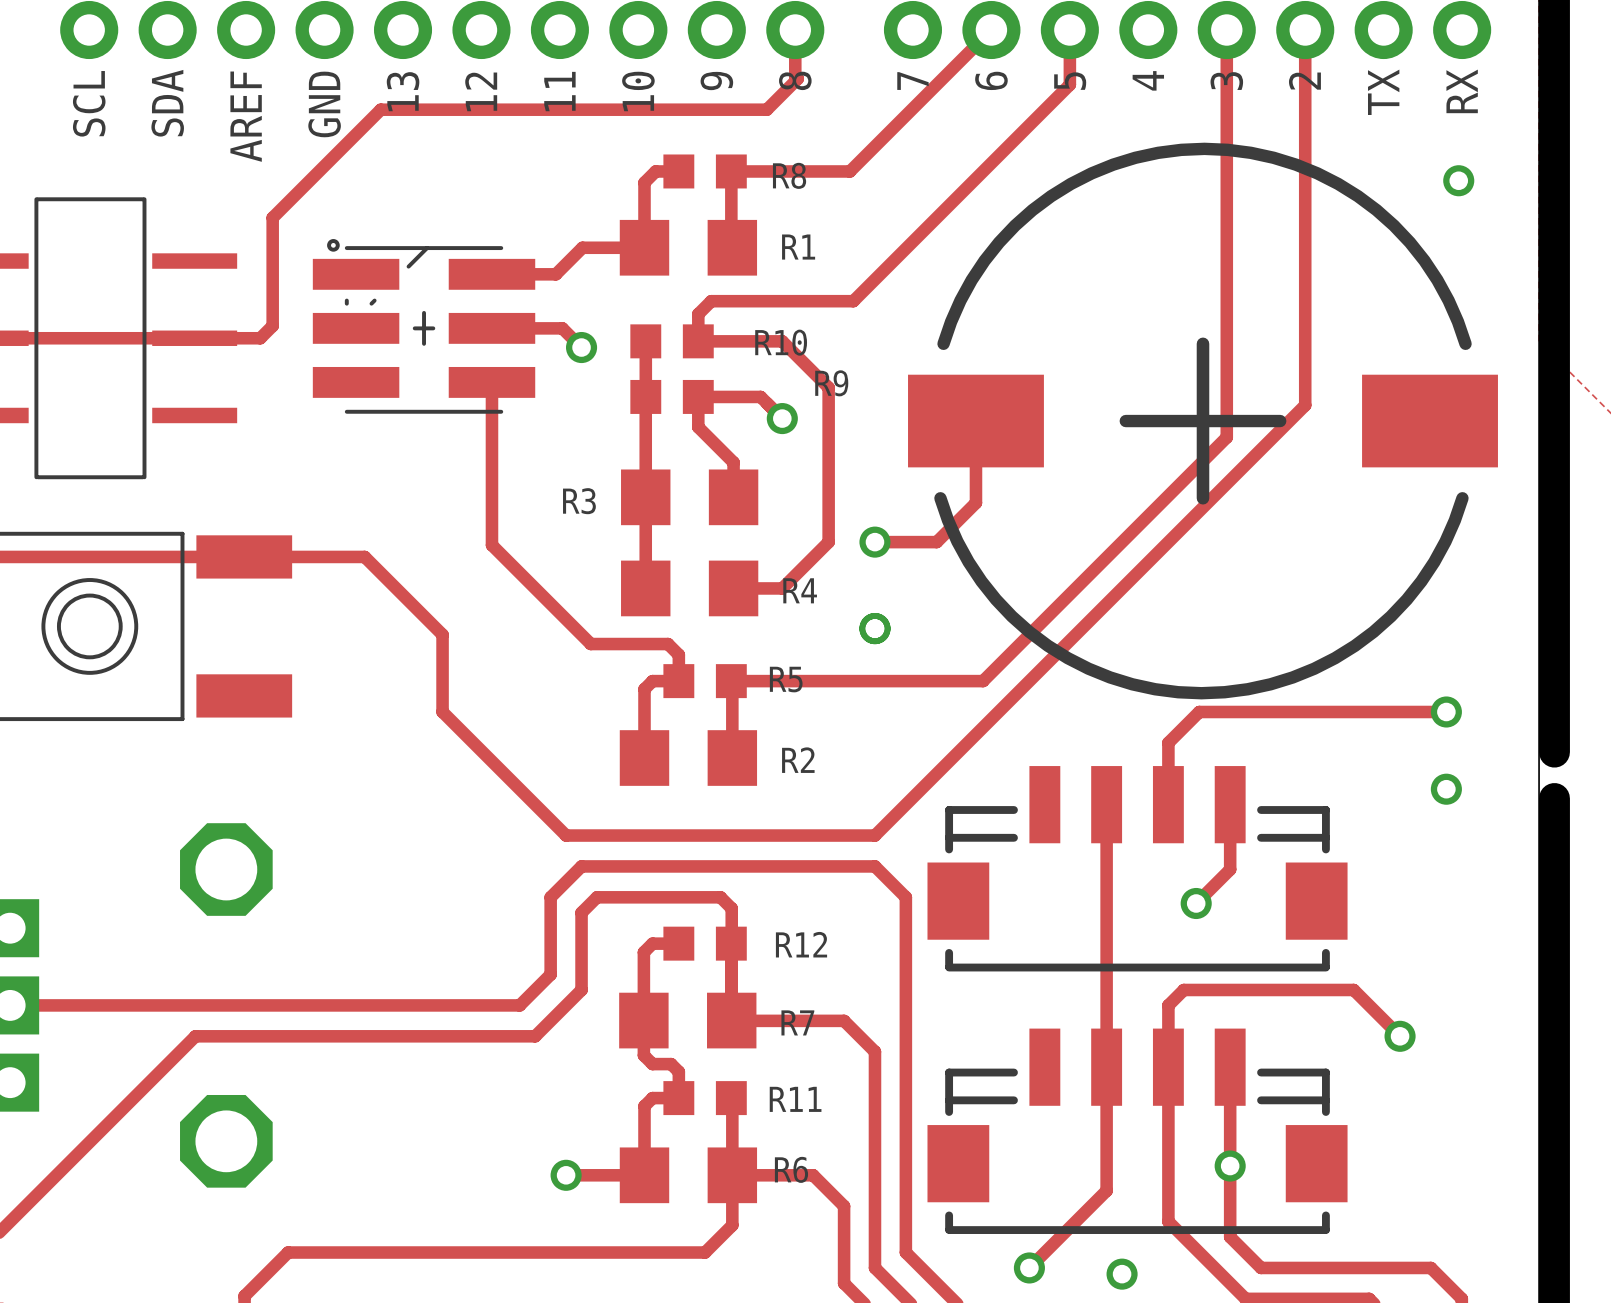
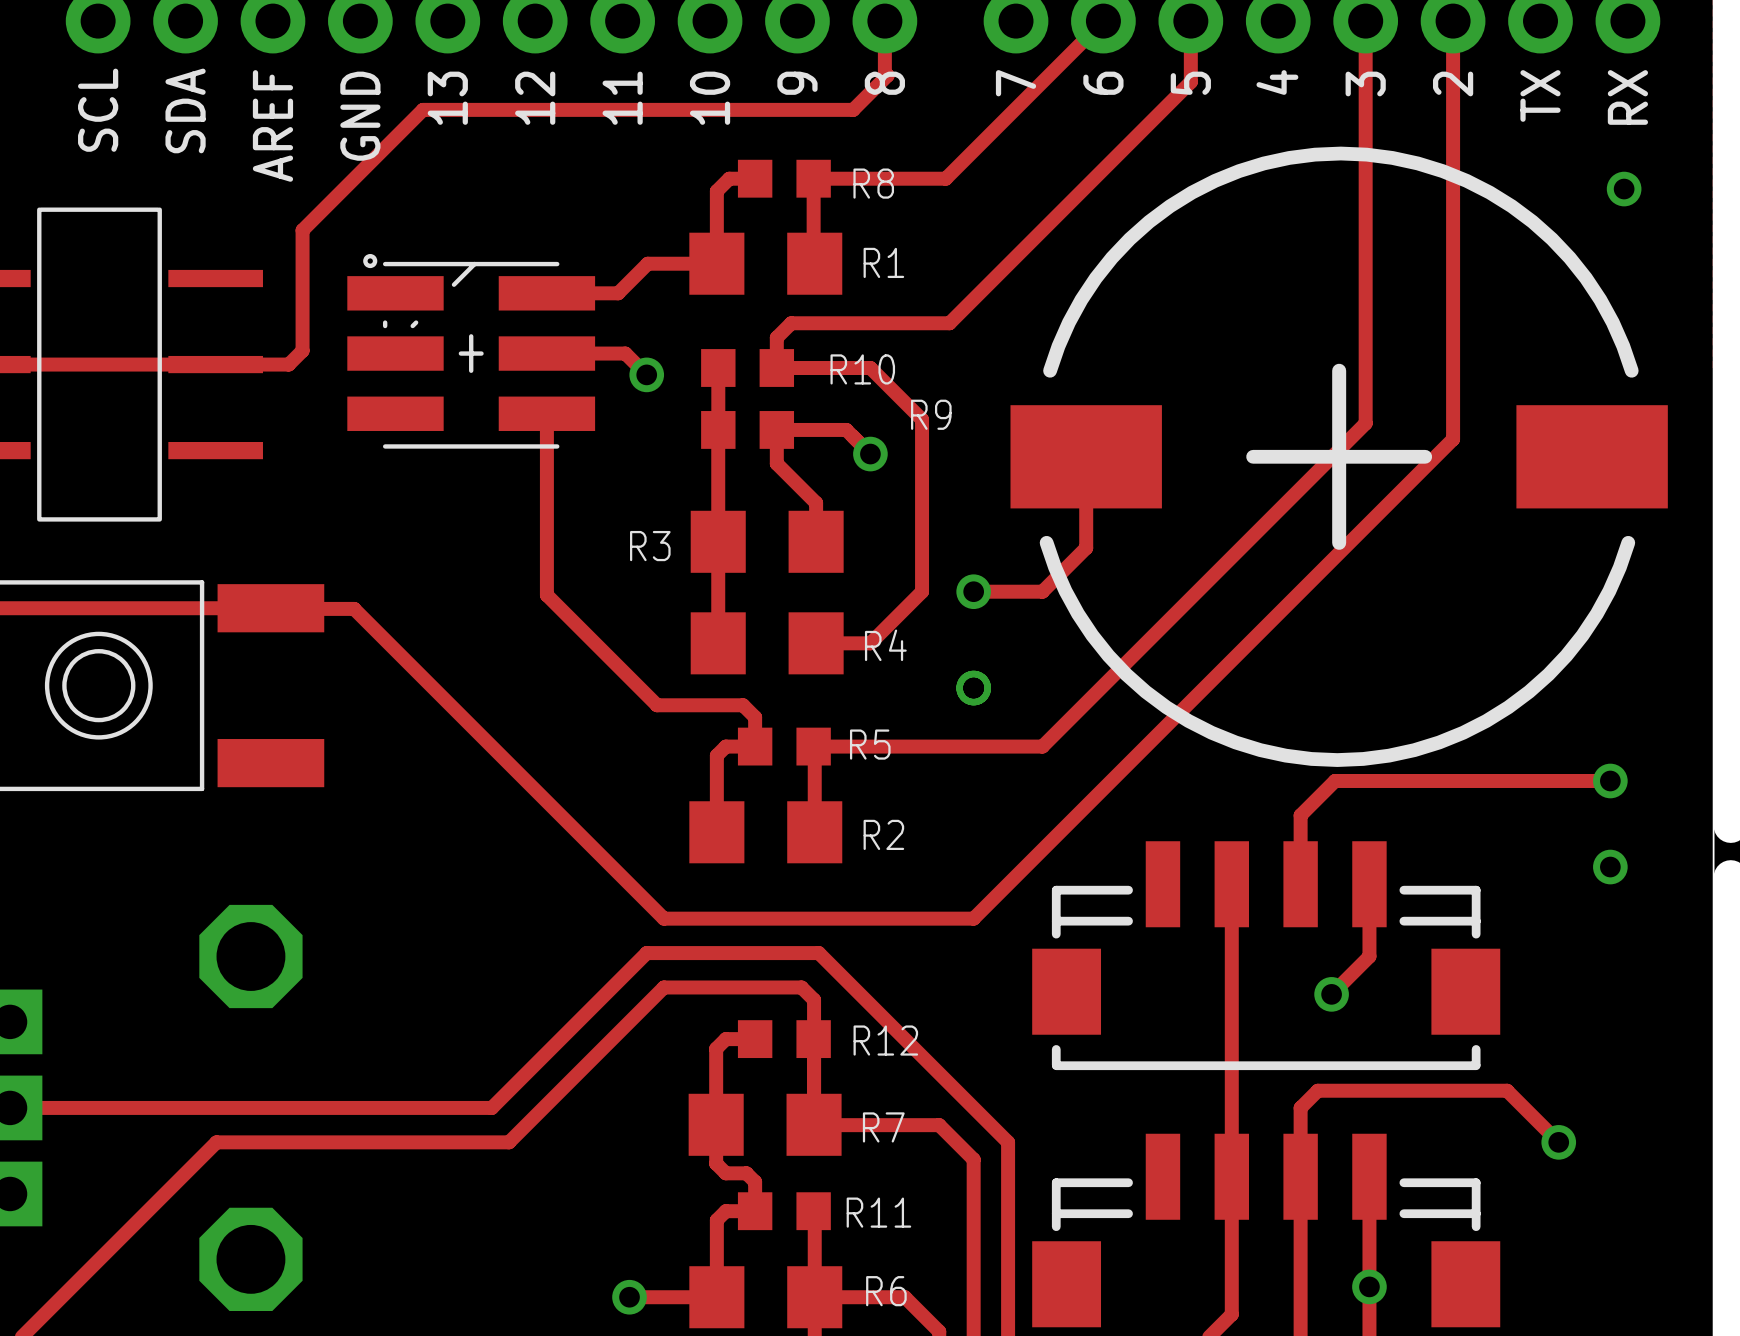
track: (1226, 391) (1226, 437) (983, 681) (936, 681) -> (1365, 423) (1042, 746)
track: (244, 556) (364, 556) (442, 634) (442, 711) (566, 835) (596, 835) -> (270, 608) (354, 608) (663, 918)
track: (735, 866) (874, 866) (905, 897) (905, 1036) -> (818, 953) (1008, 1142)
track: (550, 897) (550, 974) (519, 1005) (442, 1005) -> (612, 987) (491, 1107)
track: (581, 912) (581, 989) (535, 1036) (458, 1036) -> (646, 1004) (509, 1142)

